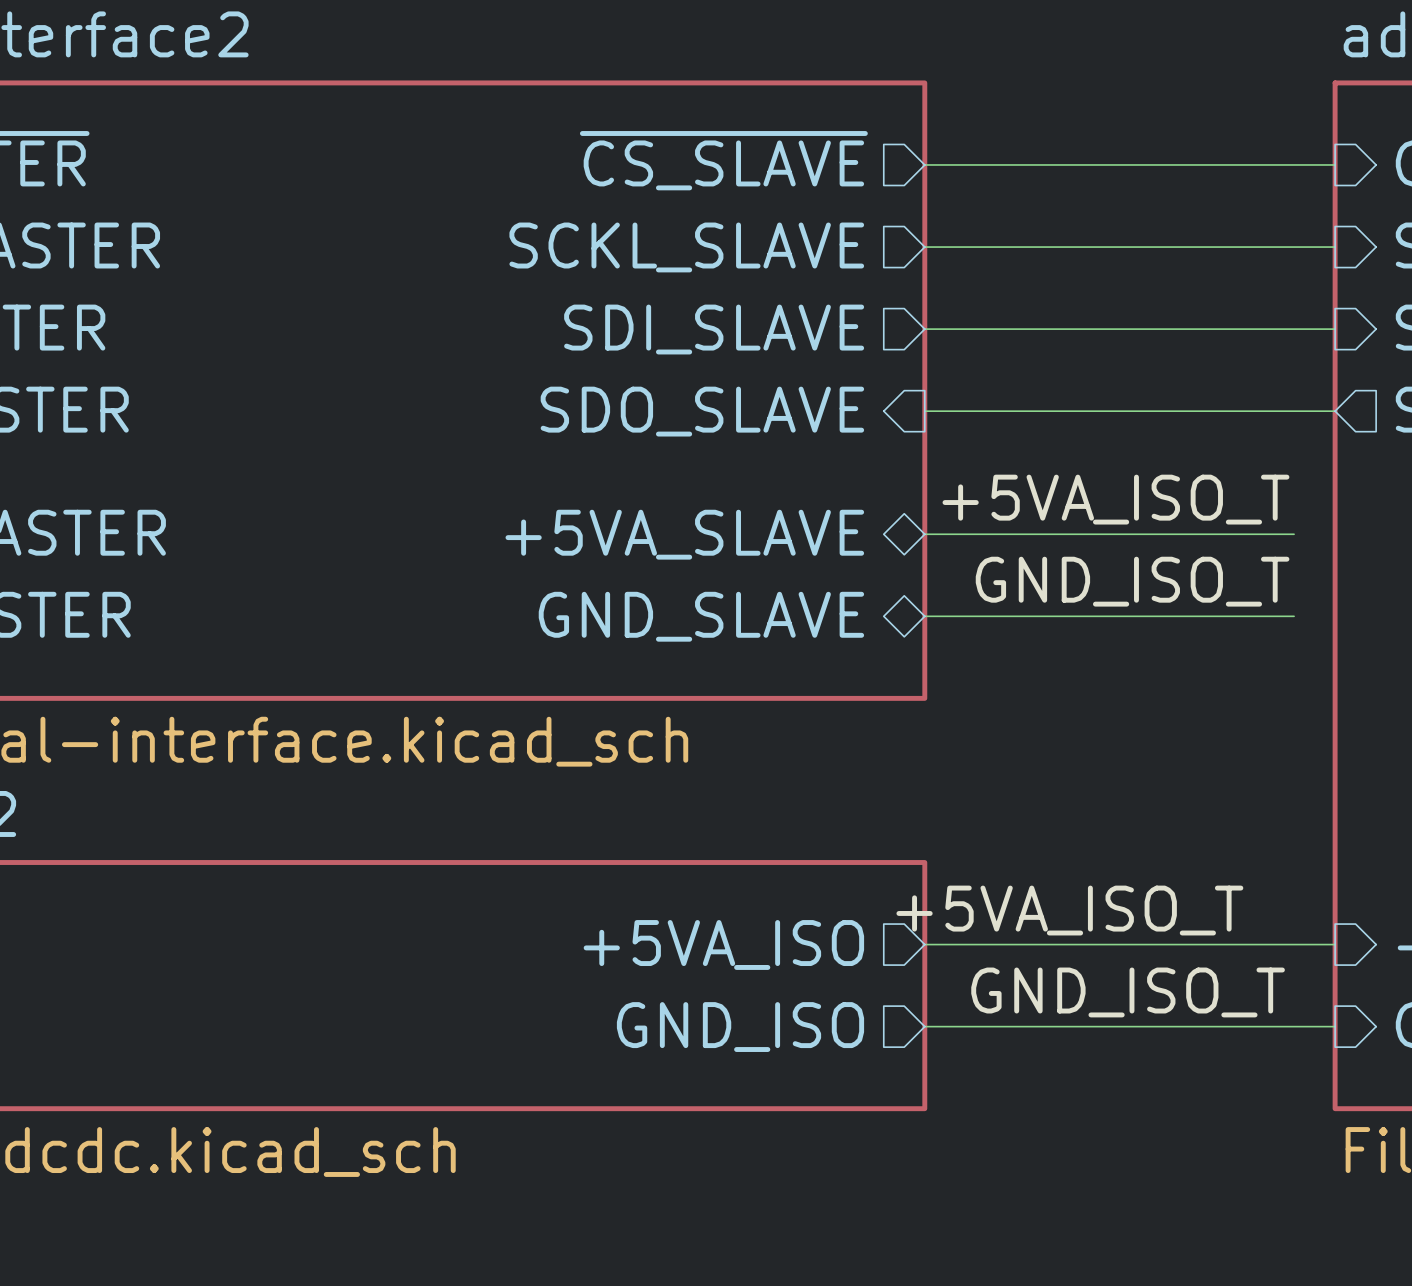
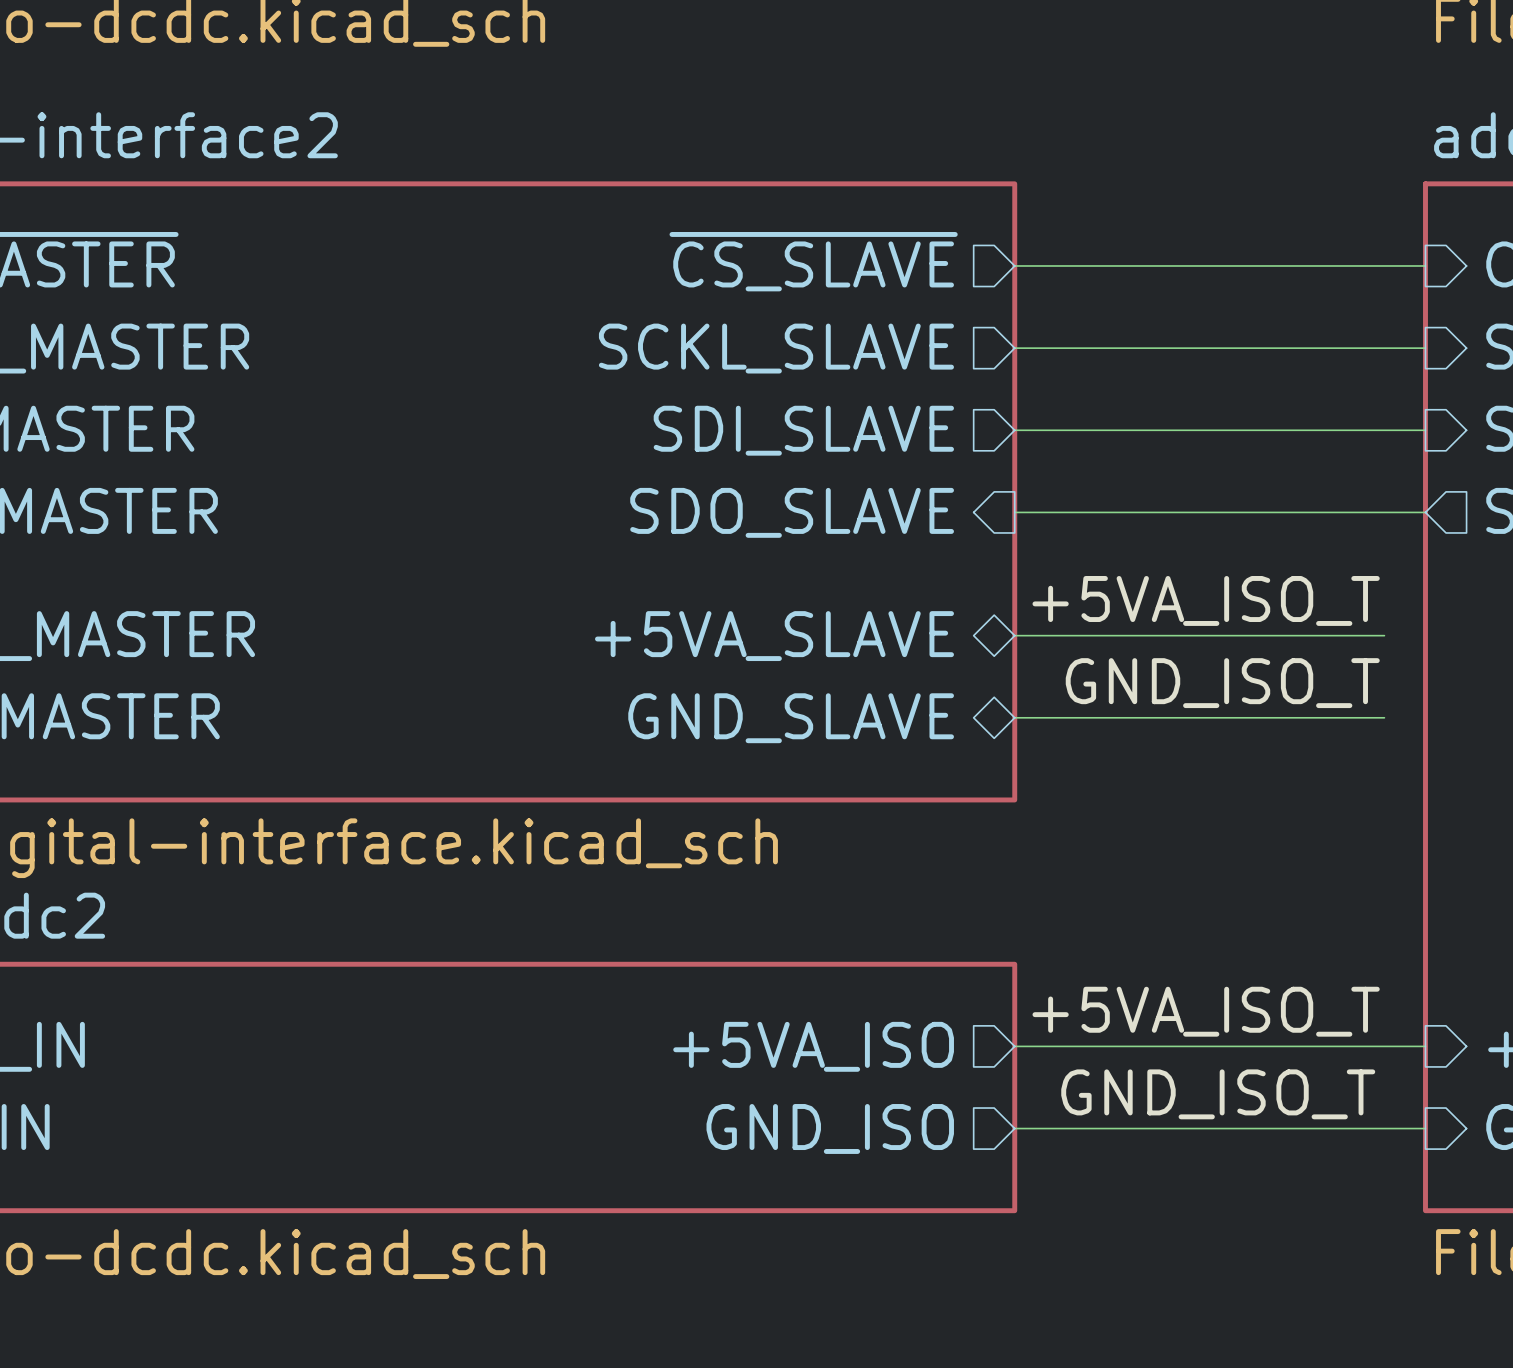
label position: +5VA_ISO_T (1069, 910) -> +5VA_ISO_T (1206, 1011)

